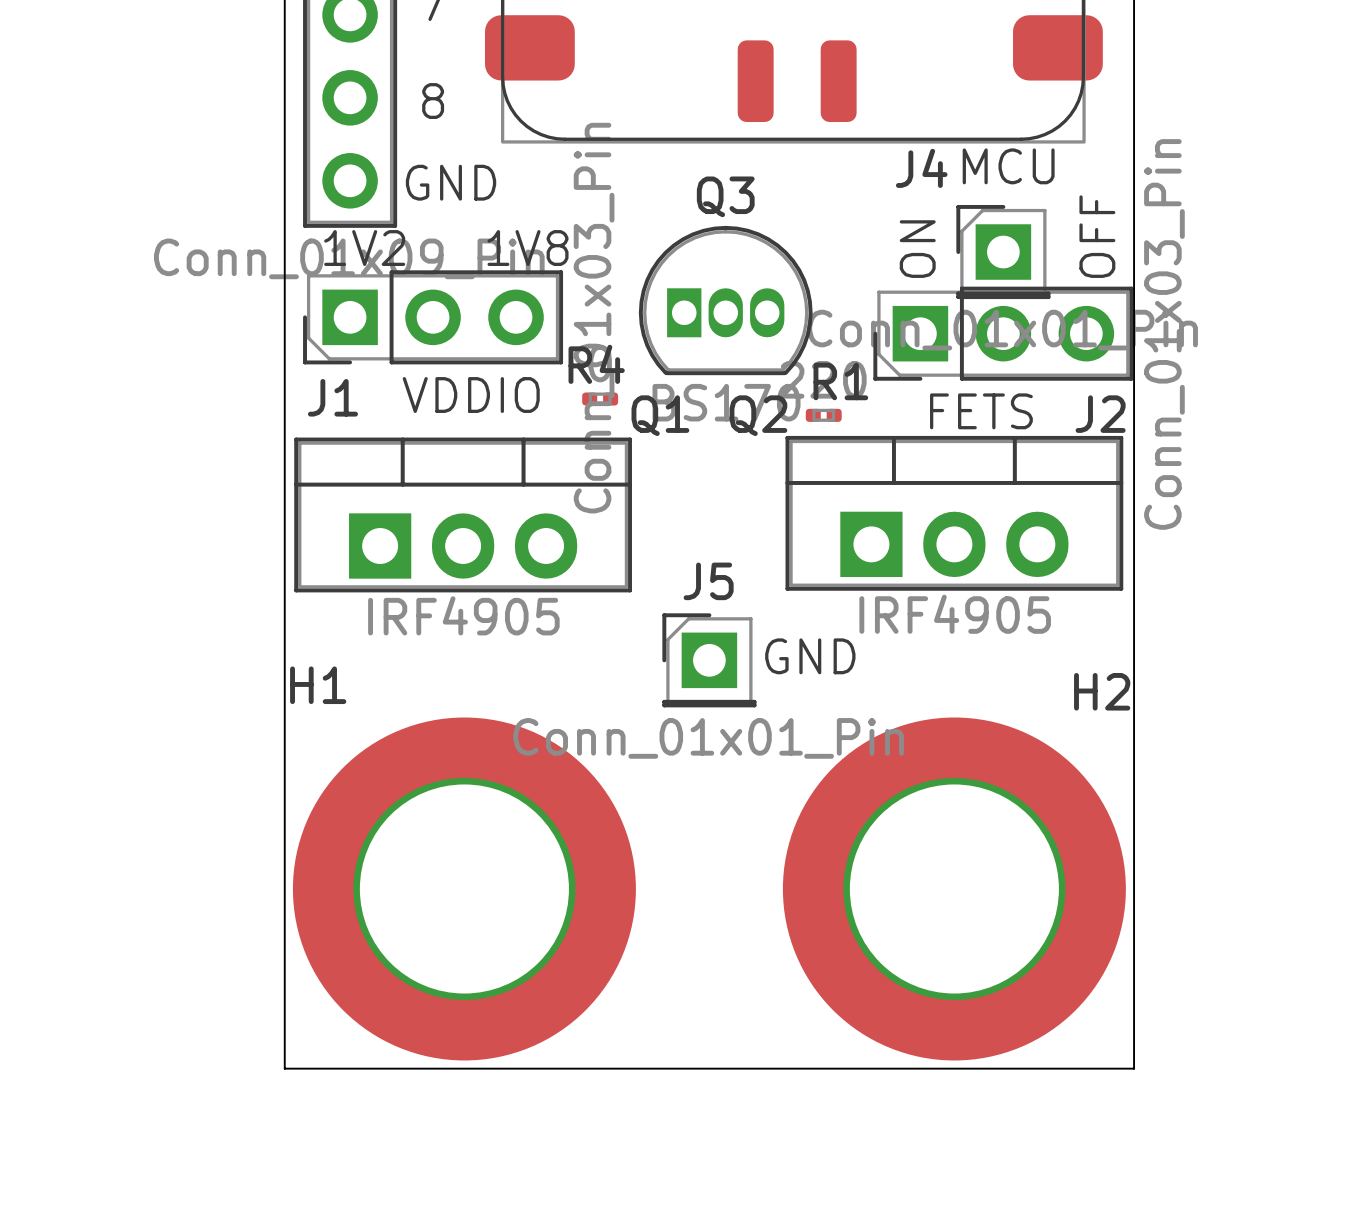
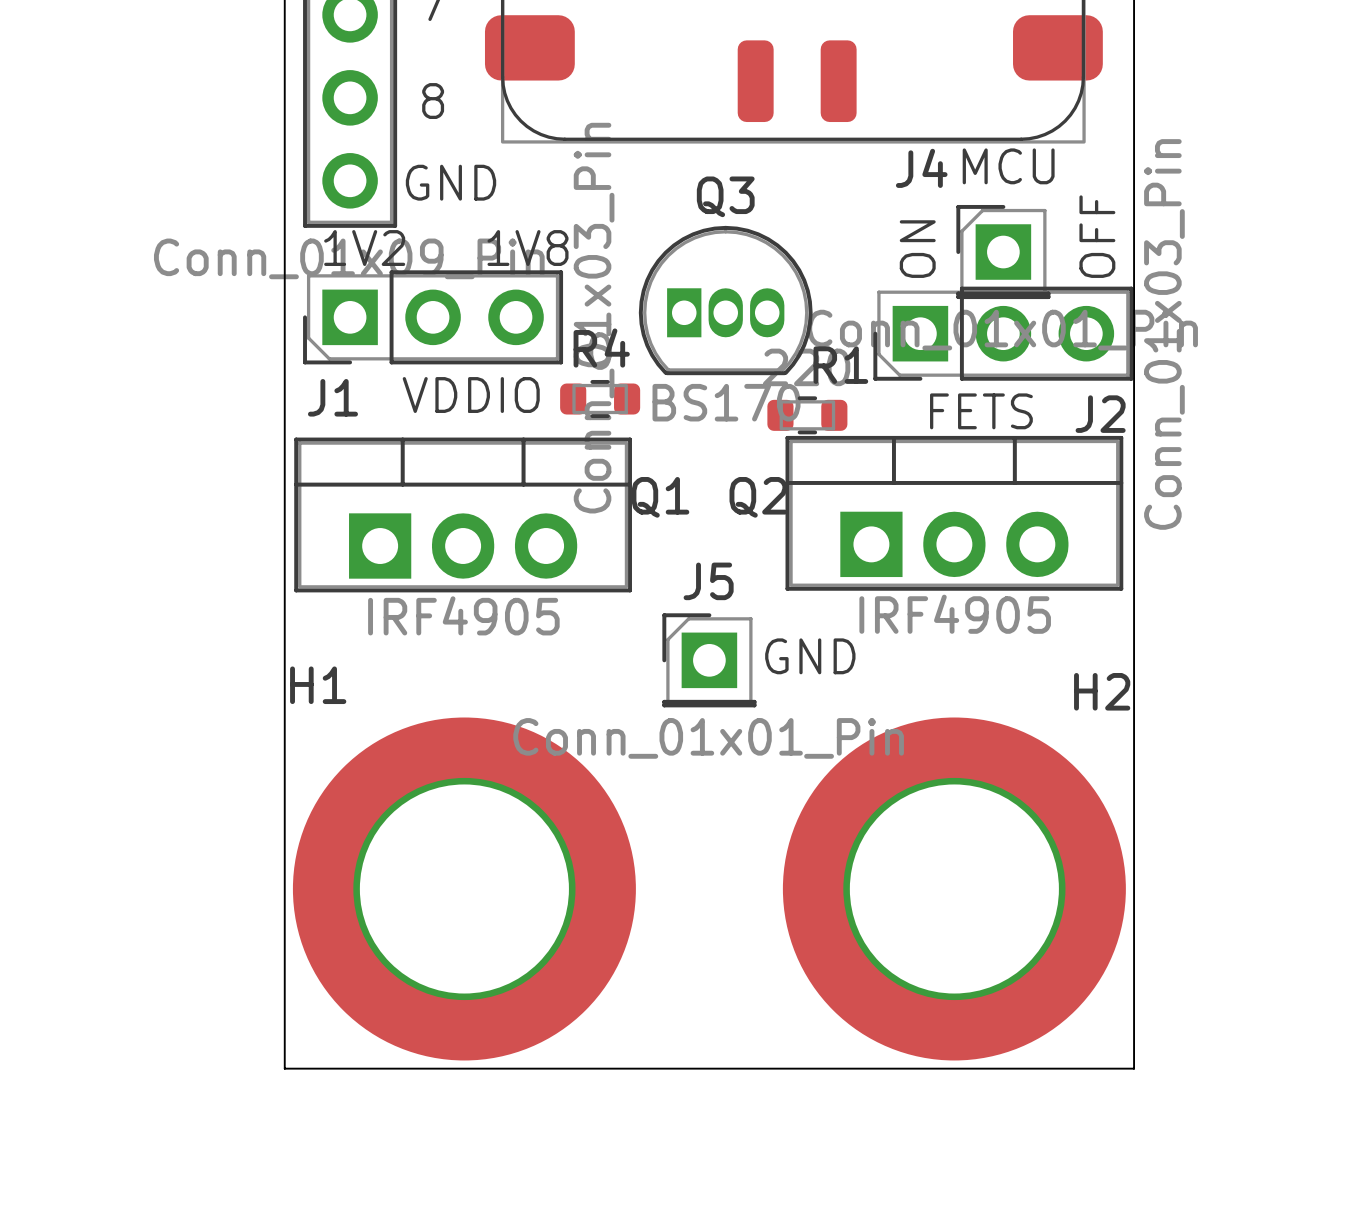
R4 footprint: [582, 392, 619, 406] -> [560, 379, 641, 419]
R1 footprint: [805, 408, 842, 422] -> [767, 396, 848, 435]
Q1 name position: Q1 (660, 415) -> Q1 (660, 497)
Q2 name position: Q2 (758, 415) -> Q2 (758, 497)

